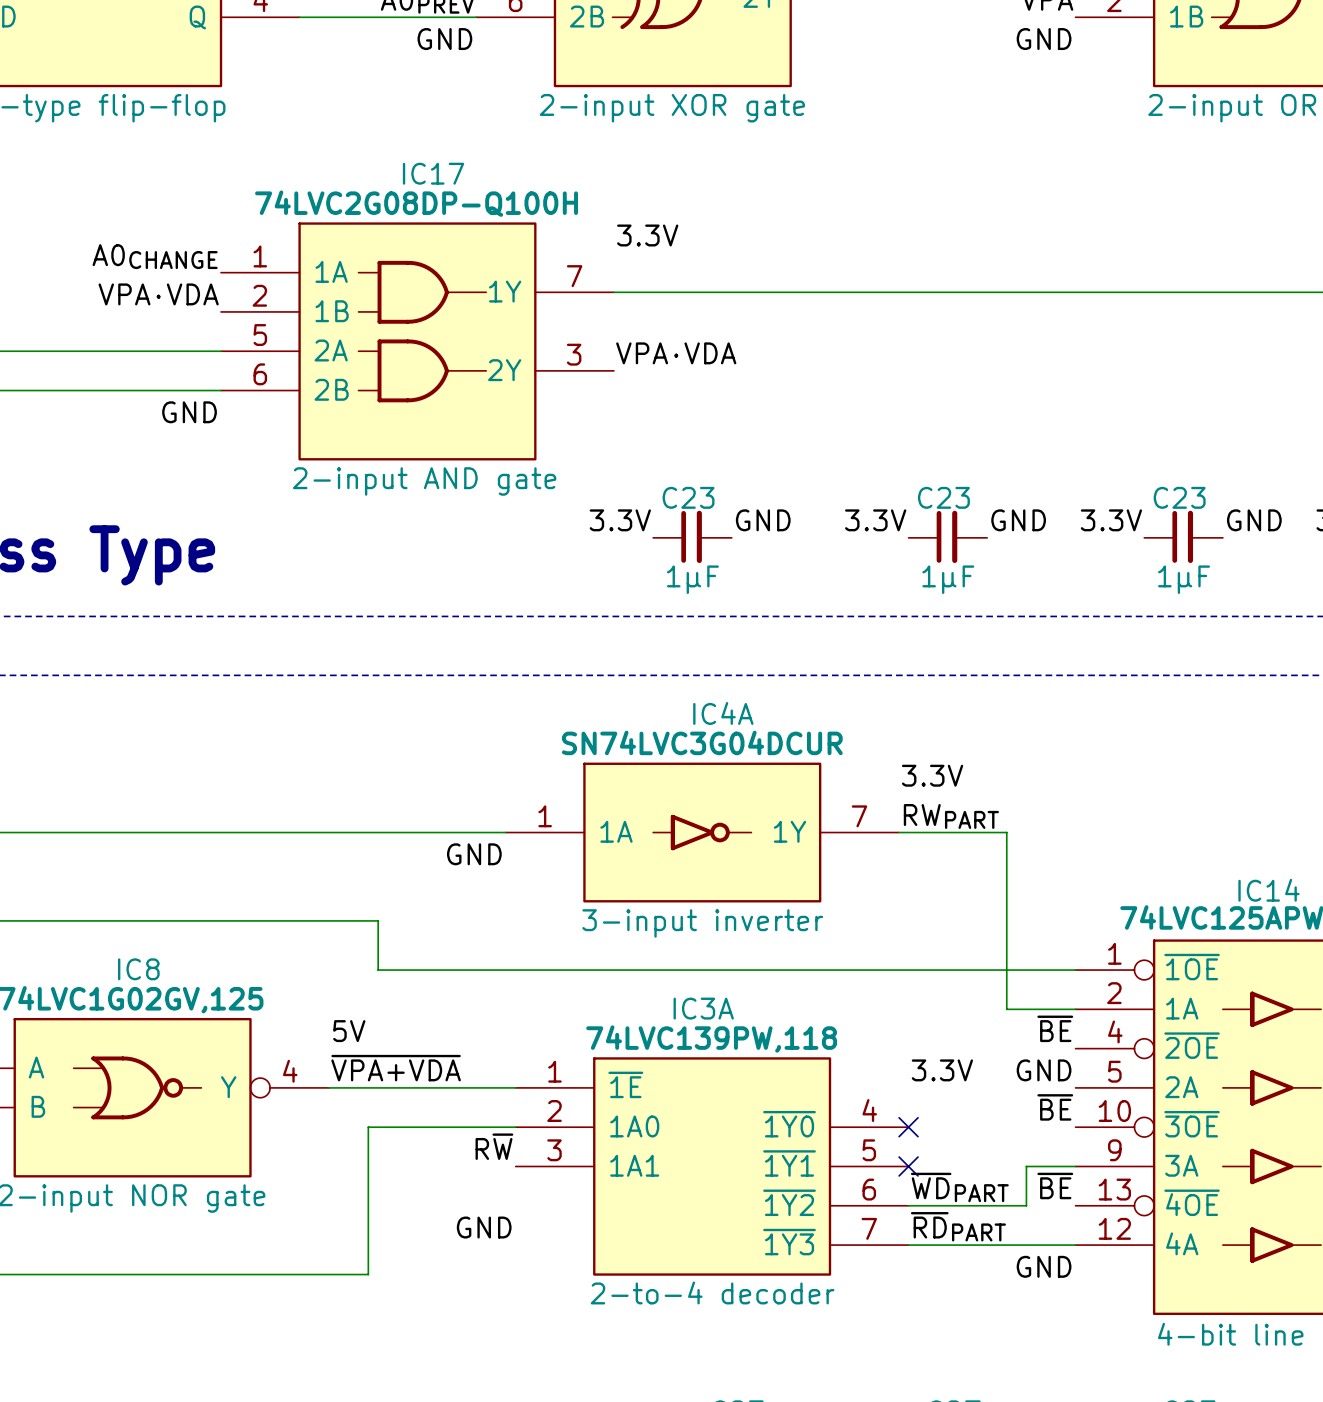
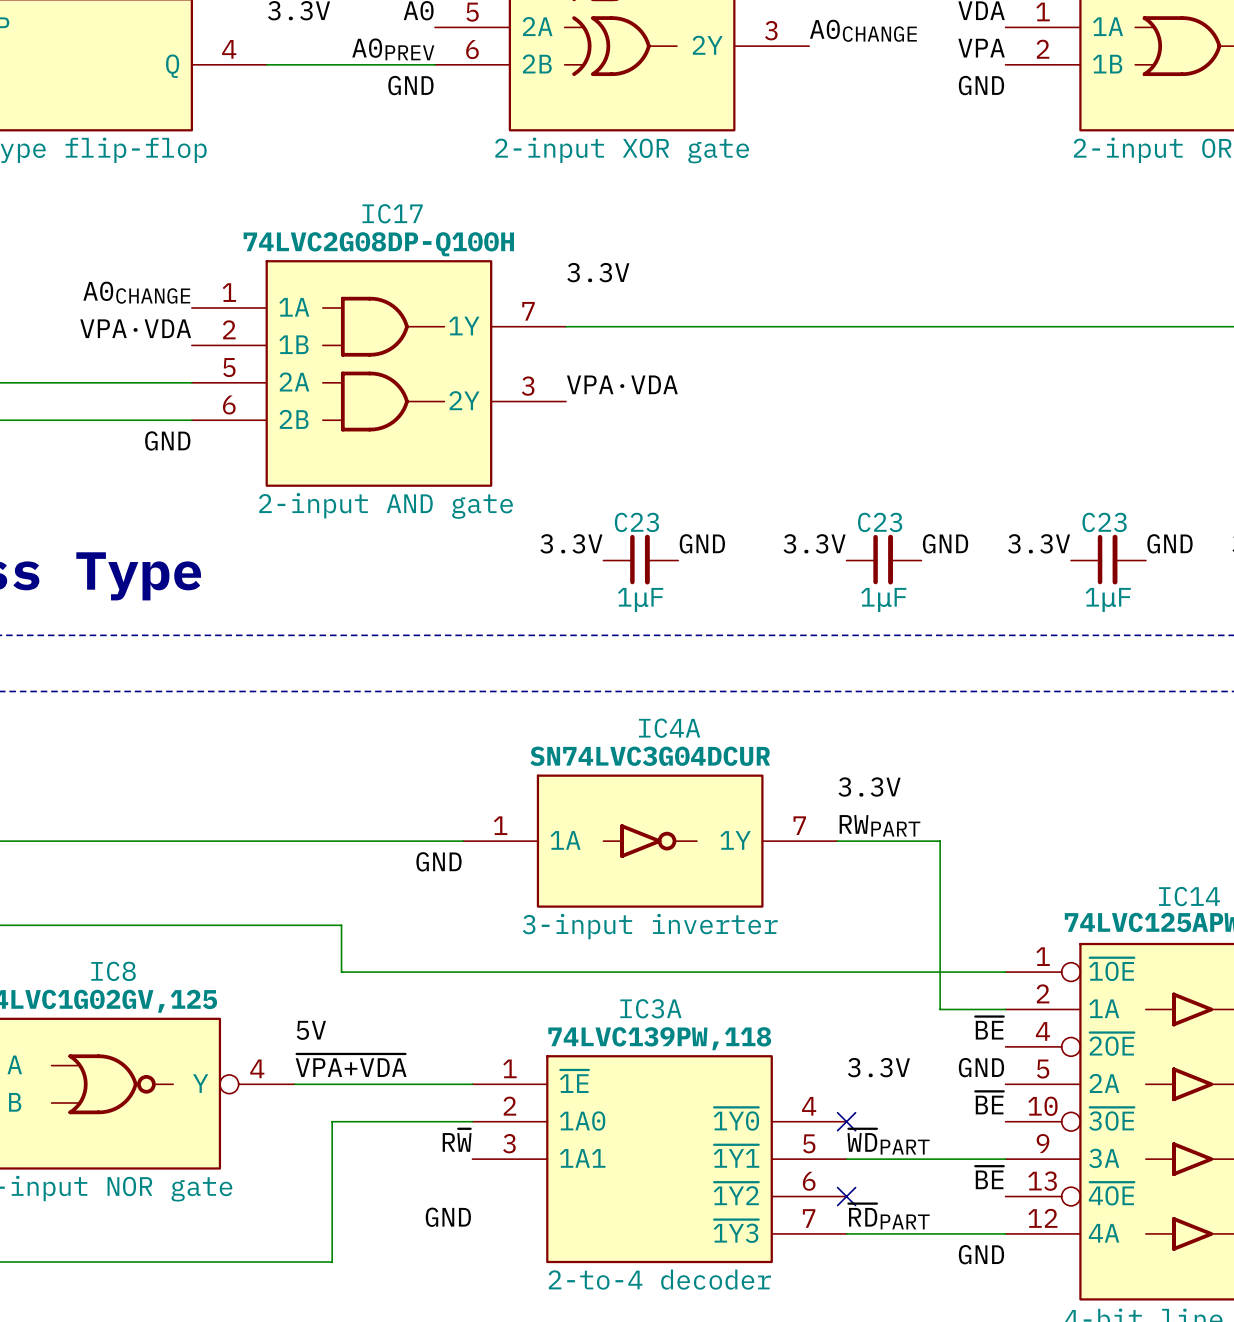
no-connect mark position: (908, 1166) -> (846, 1196)
wire: (1026, 1166) (1026, 1205) (908, 1205) -> (958, 1159) (846, 1159)
label position: ~{WD}PART (959, 1187) -> ~{WD}PART (888, 1141)

